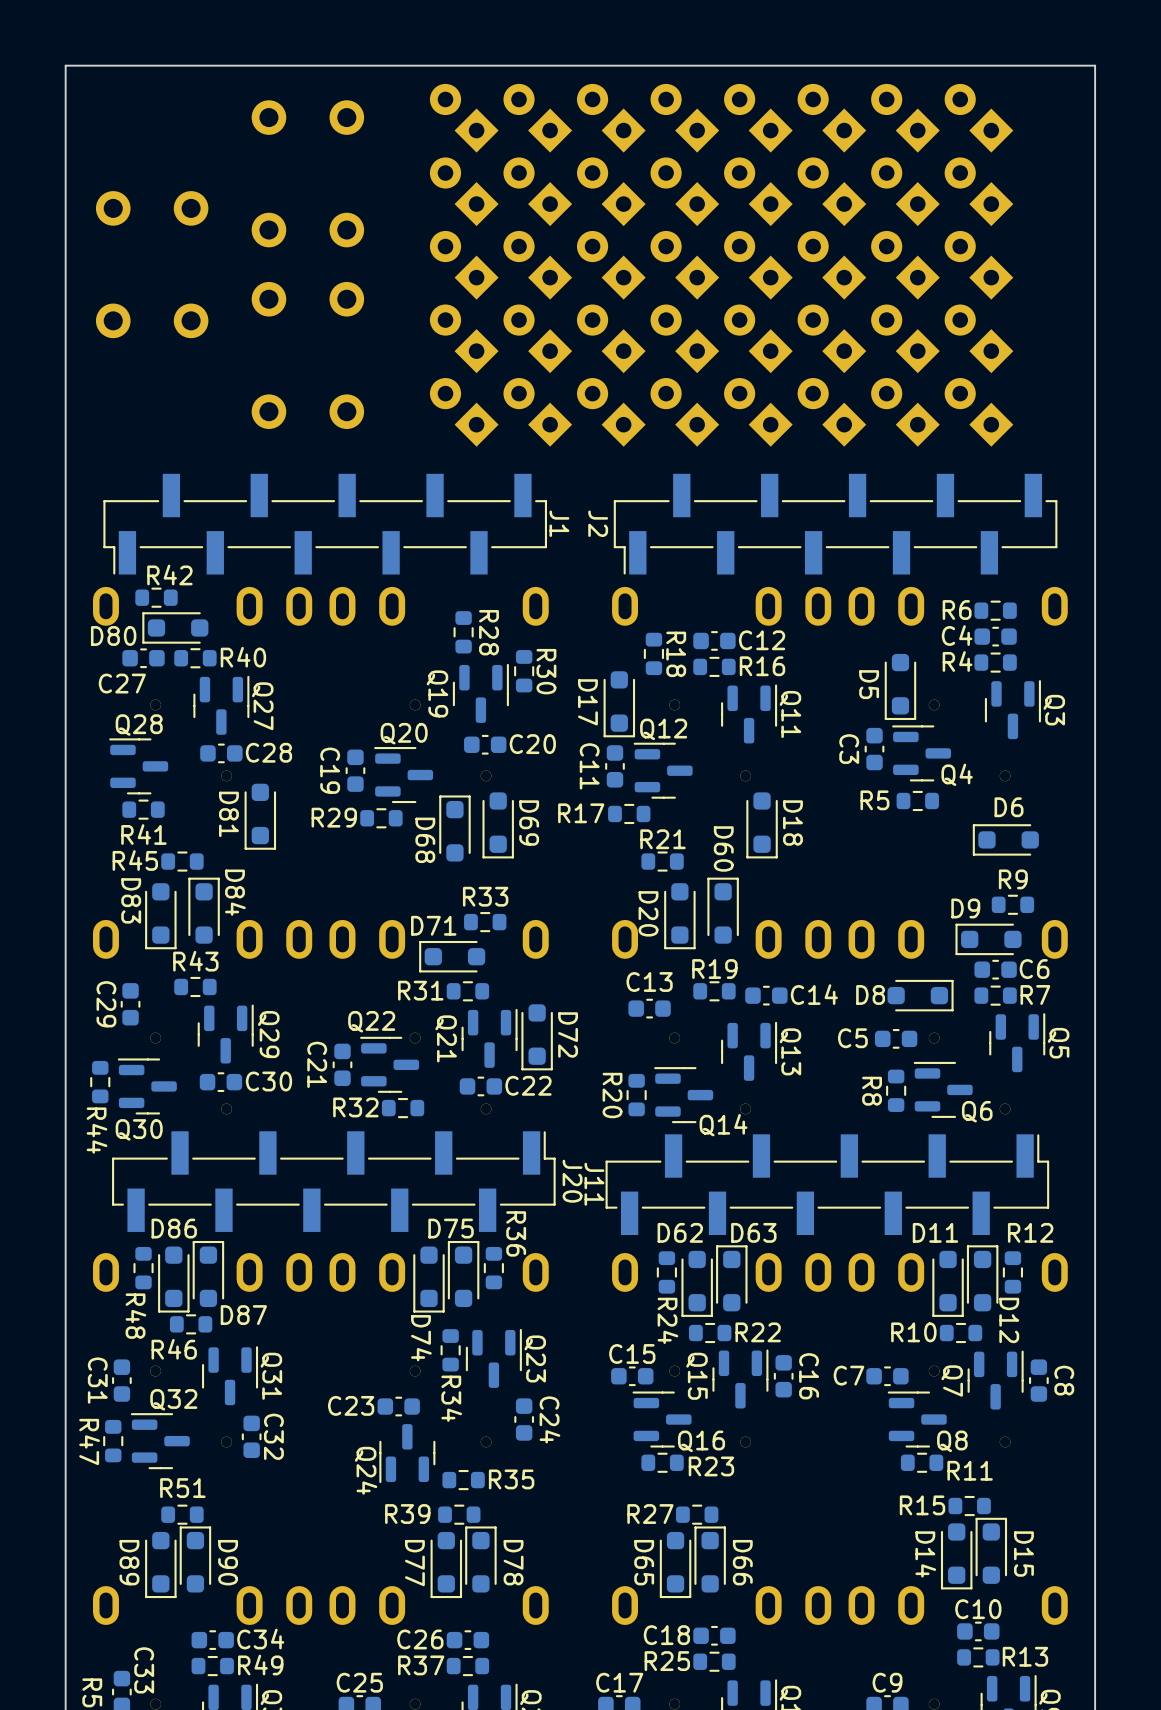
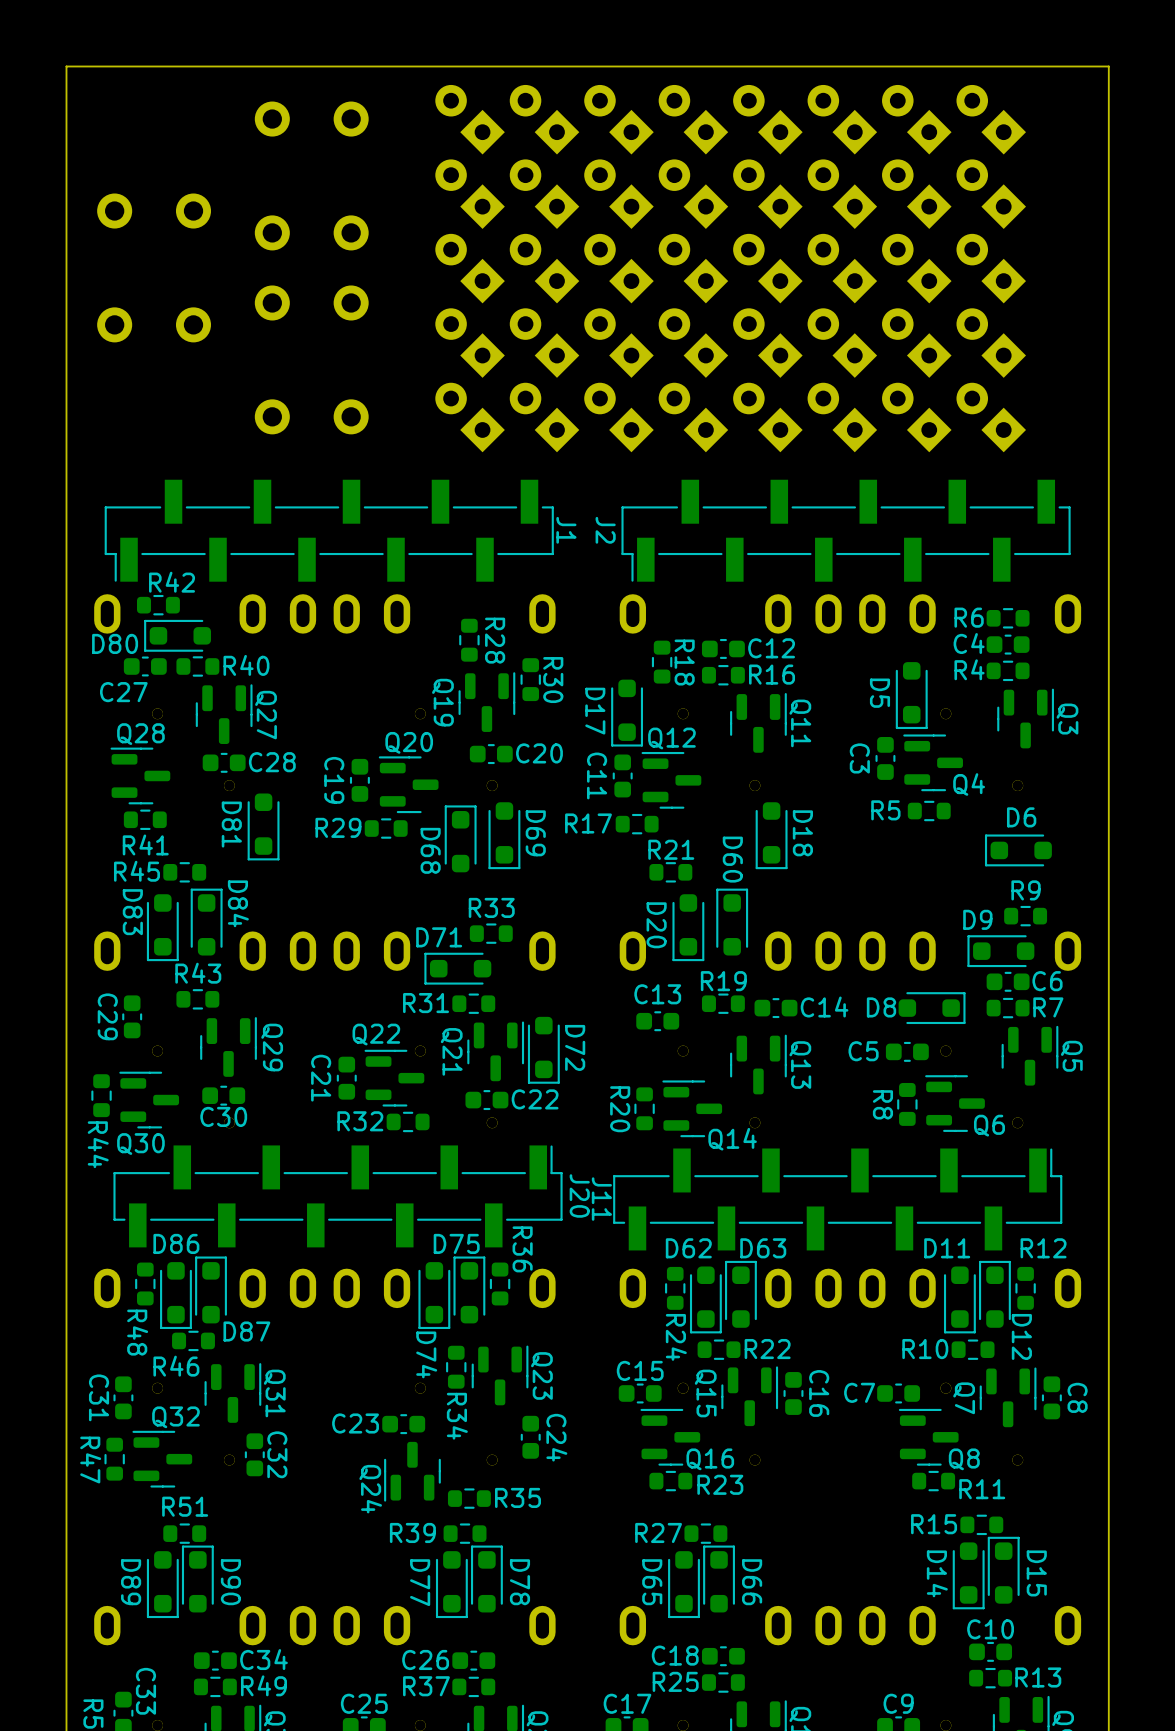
C30 name position: C30 (268, 1081) -> C30 (223, 1116)

